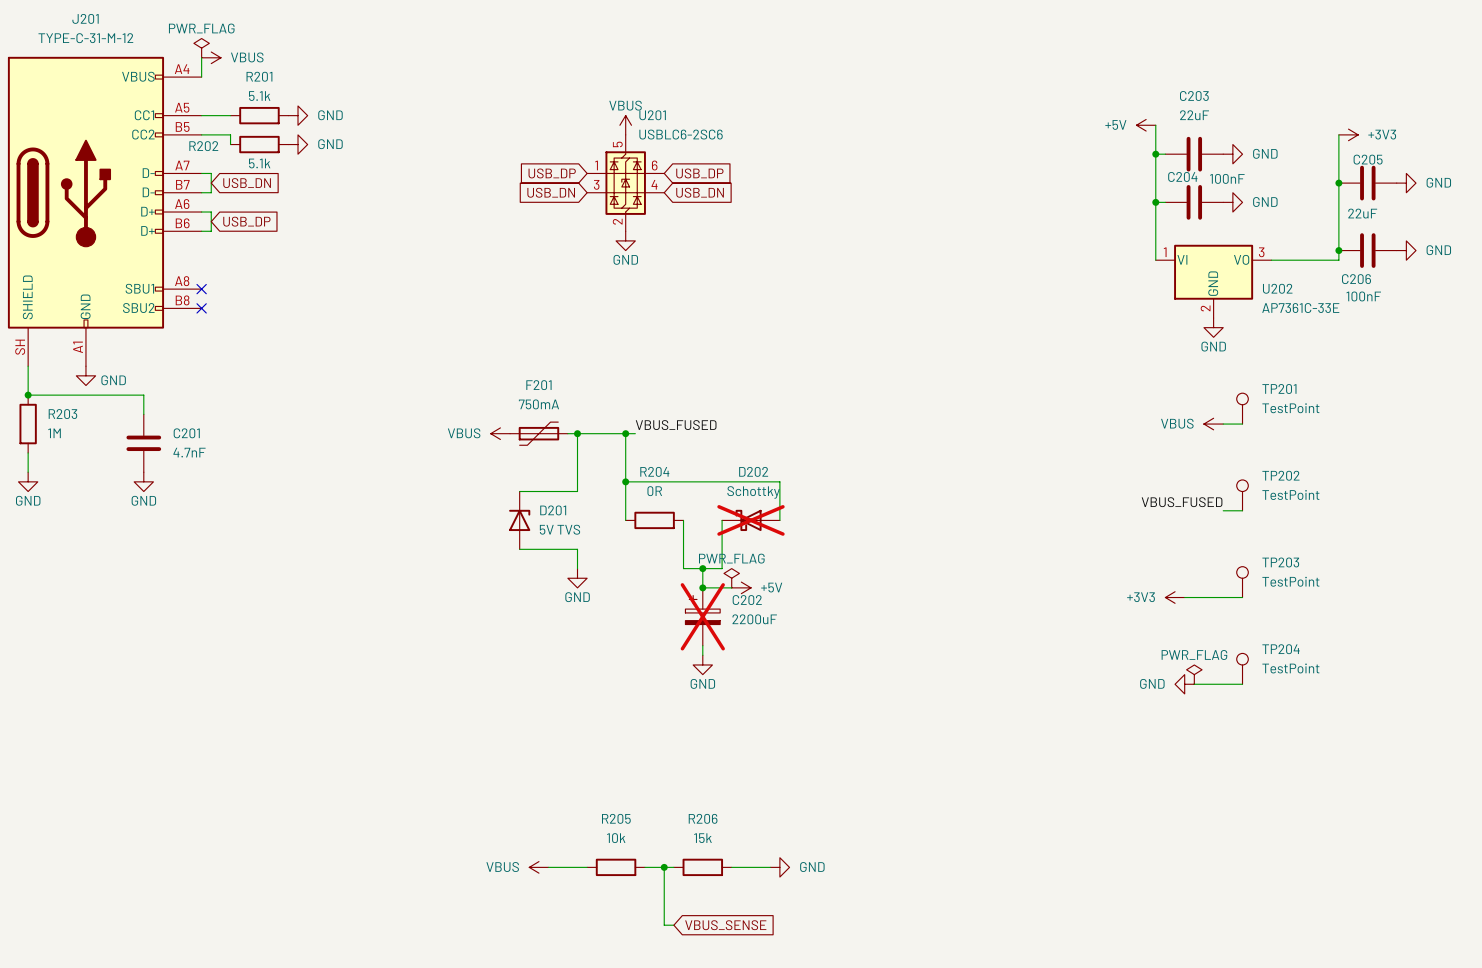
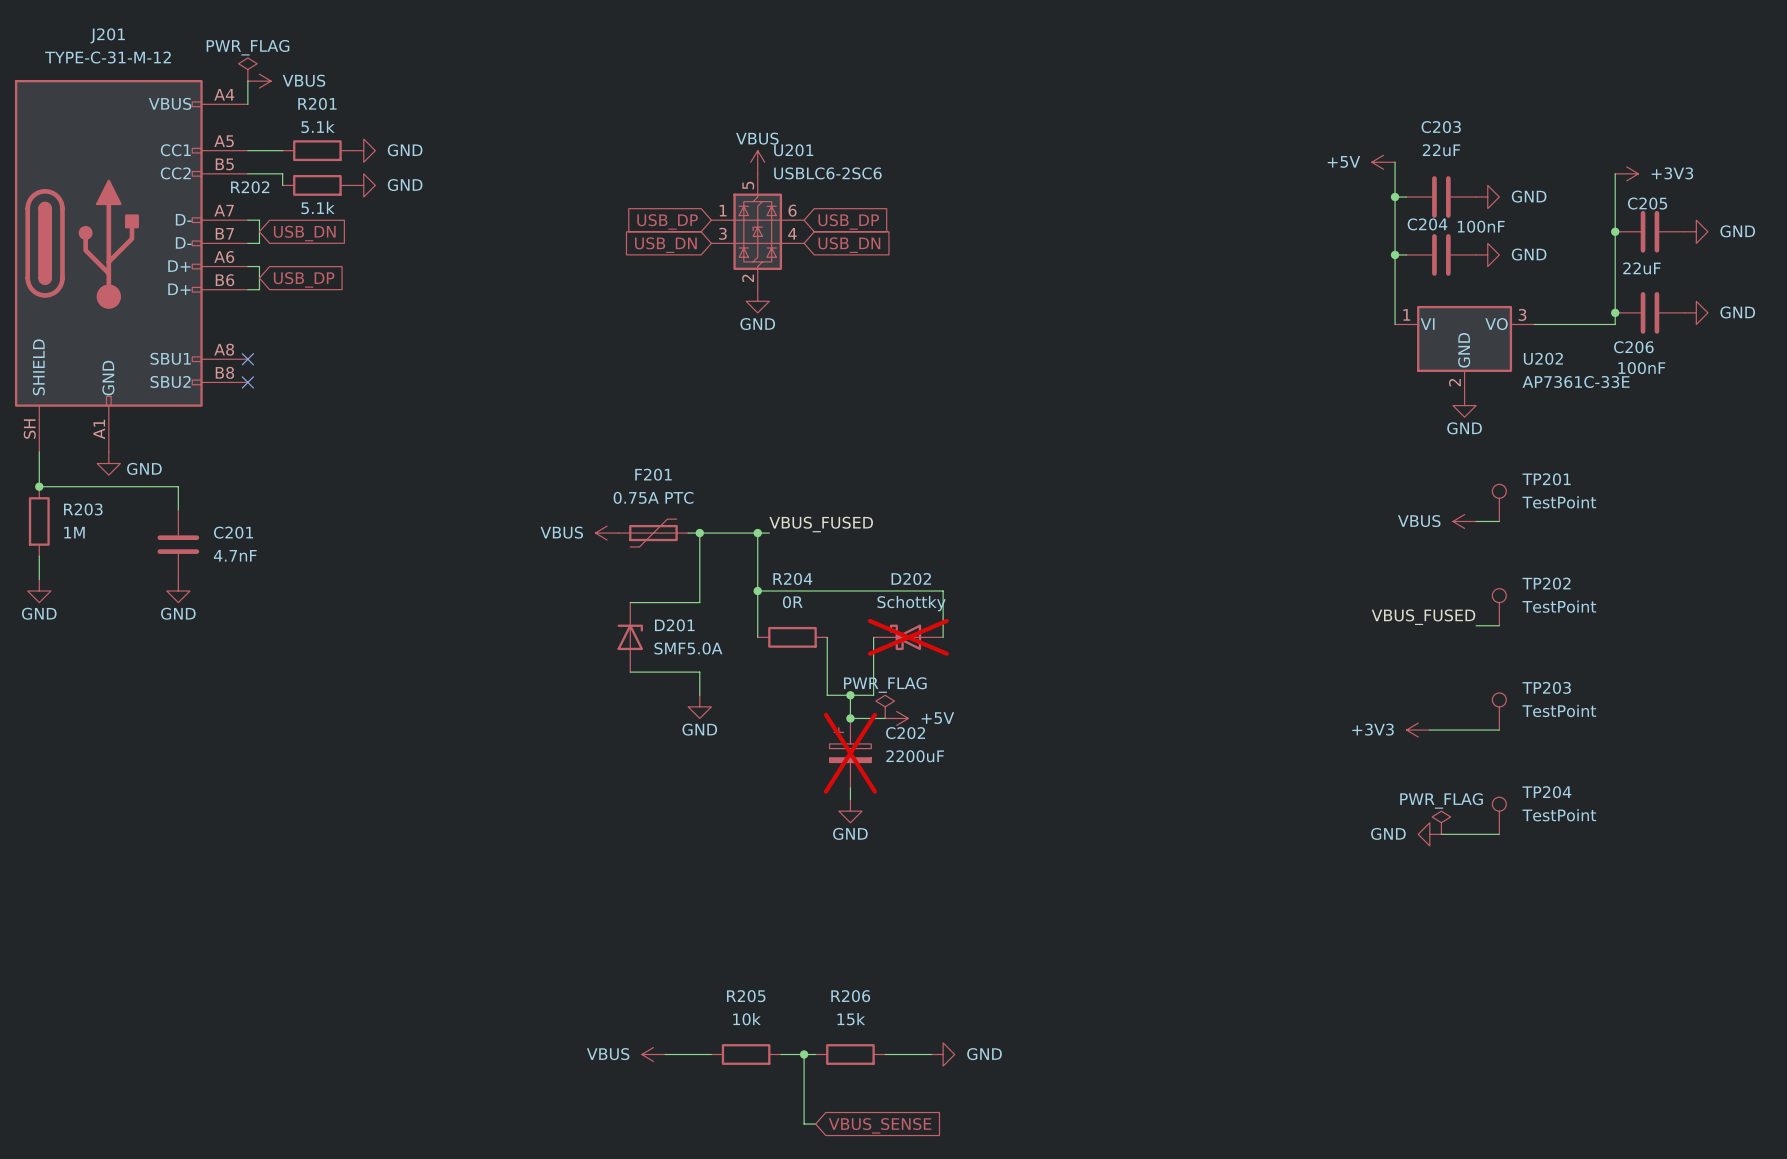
F201 value: 750mA (538, 404) -> 0.75A PTC (653, 497)
D201 value: 5V TVS (559, 529) -> SMF5.0A (688, 648)

